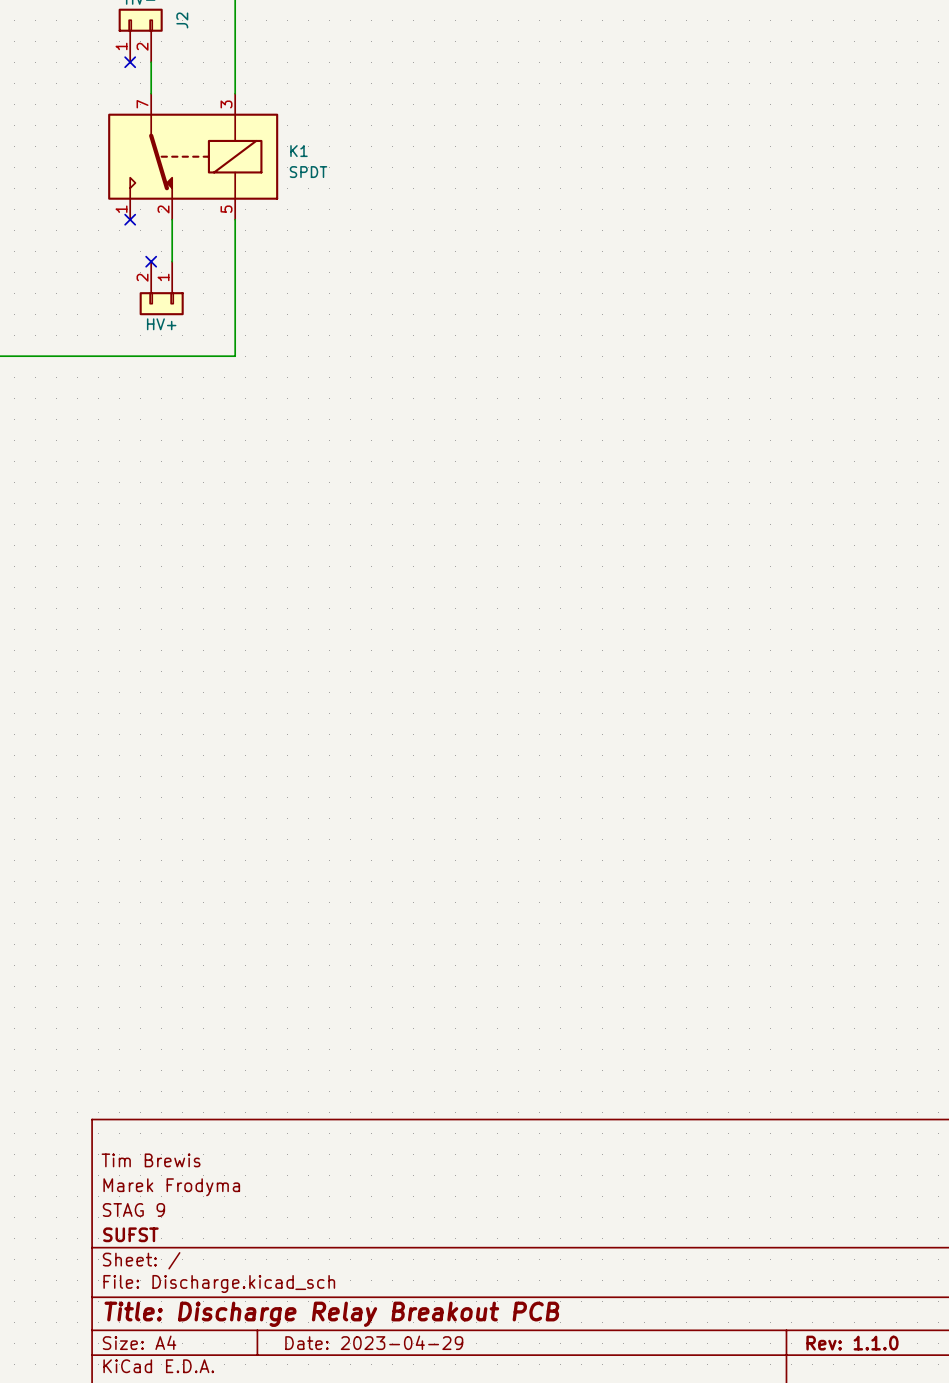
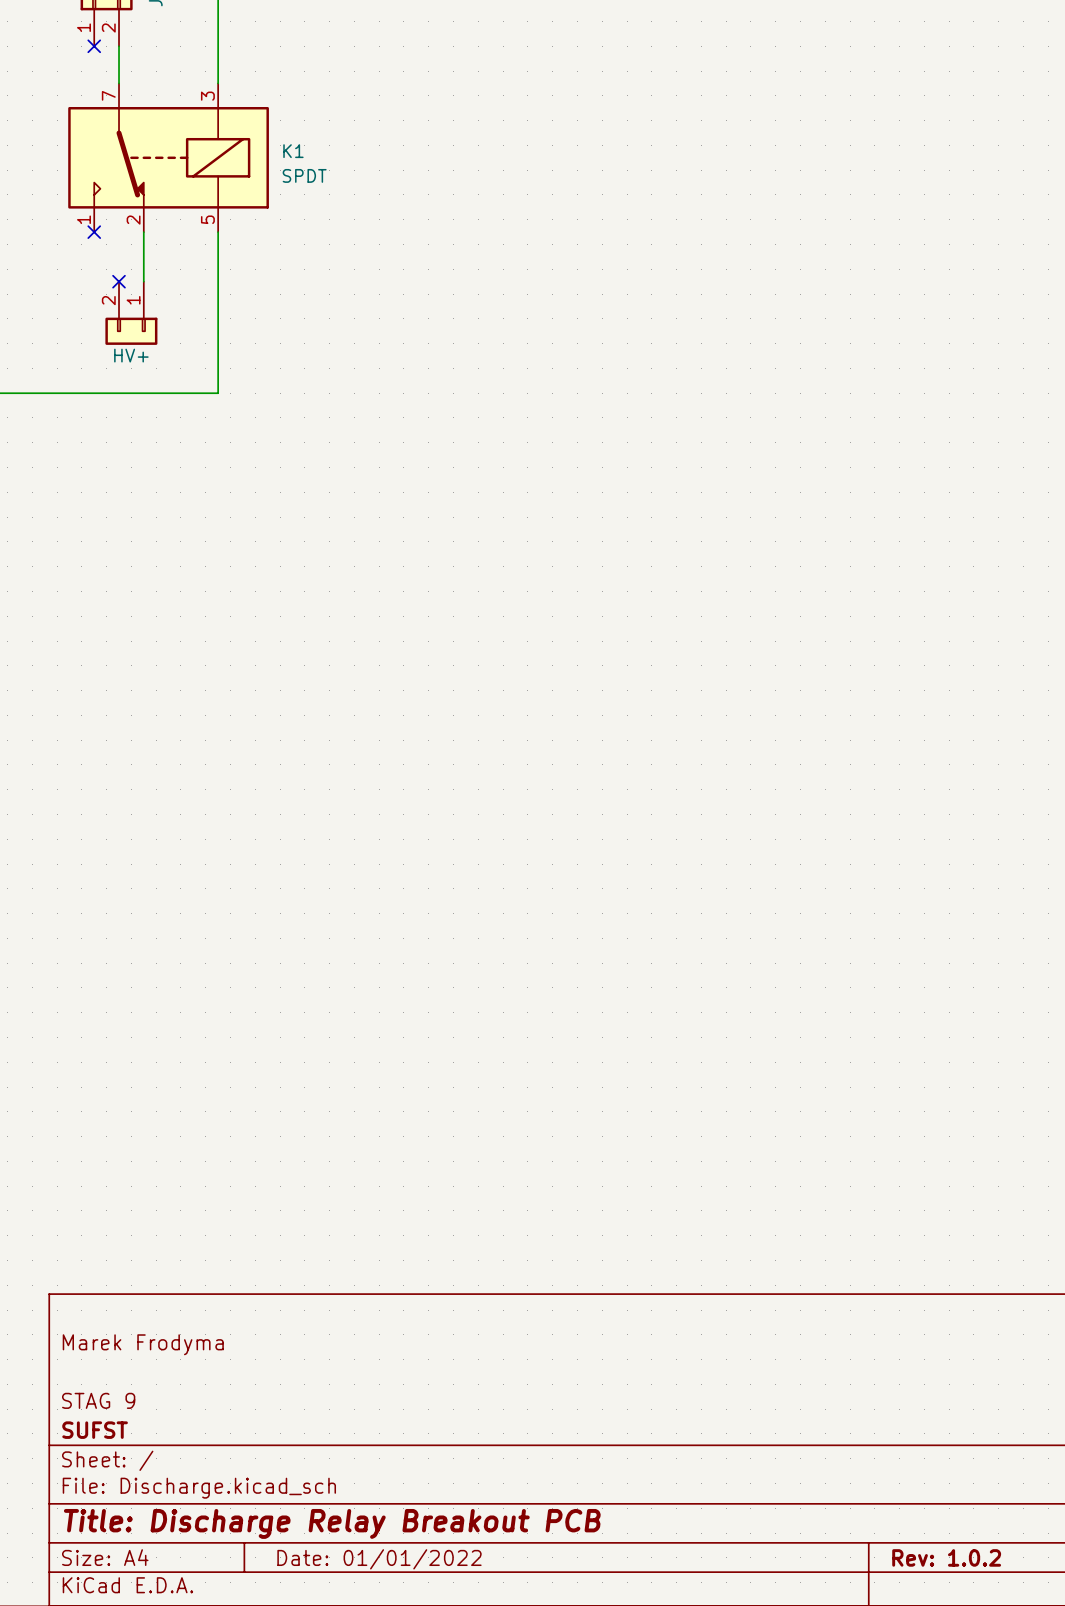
title block: Tim Brewis (151, 1160) -> Marek Frodyma (143, 1344)
title block: Marek Frodyma (171, 1187) -> none
title block: Date: 2023-04-29 (374, 1342) -> Date: 01/01/2022 (379, 1559)
title block: Rev: 1.1.0 (852, 1343) -> Rev: 1.0.2 (946, 1557)

